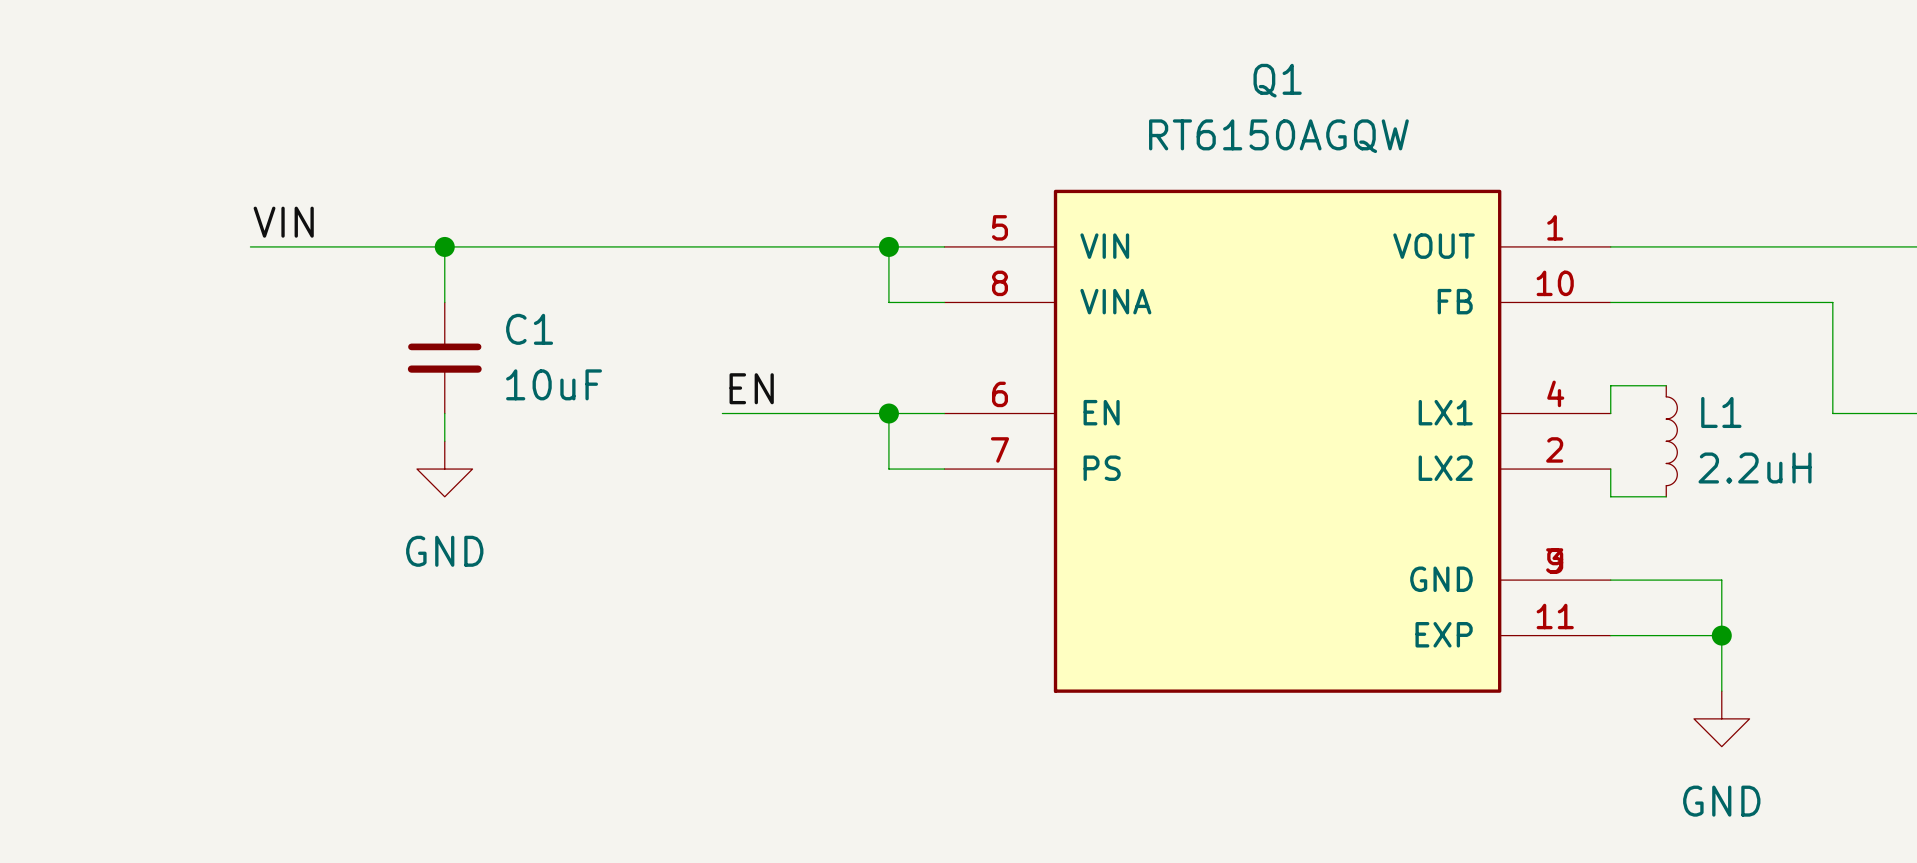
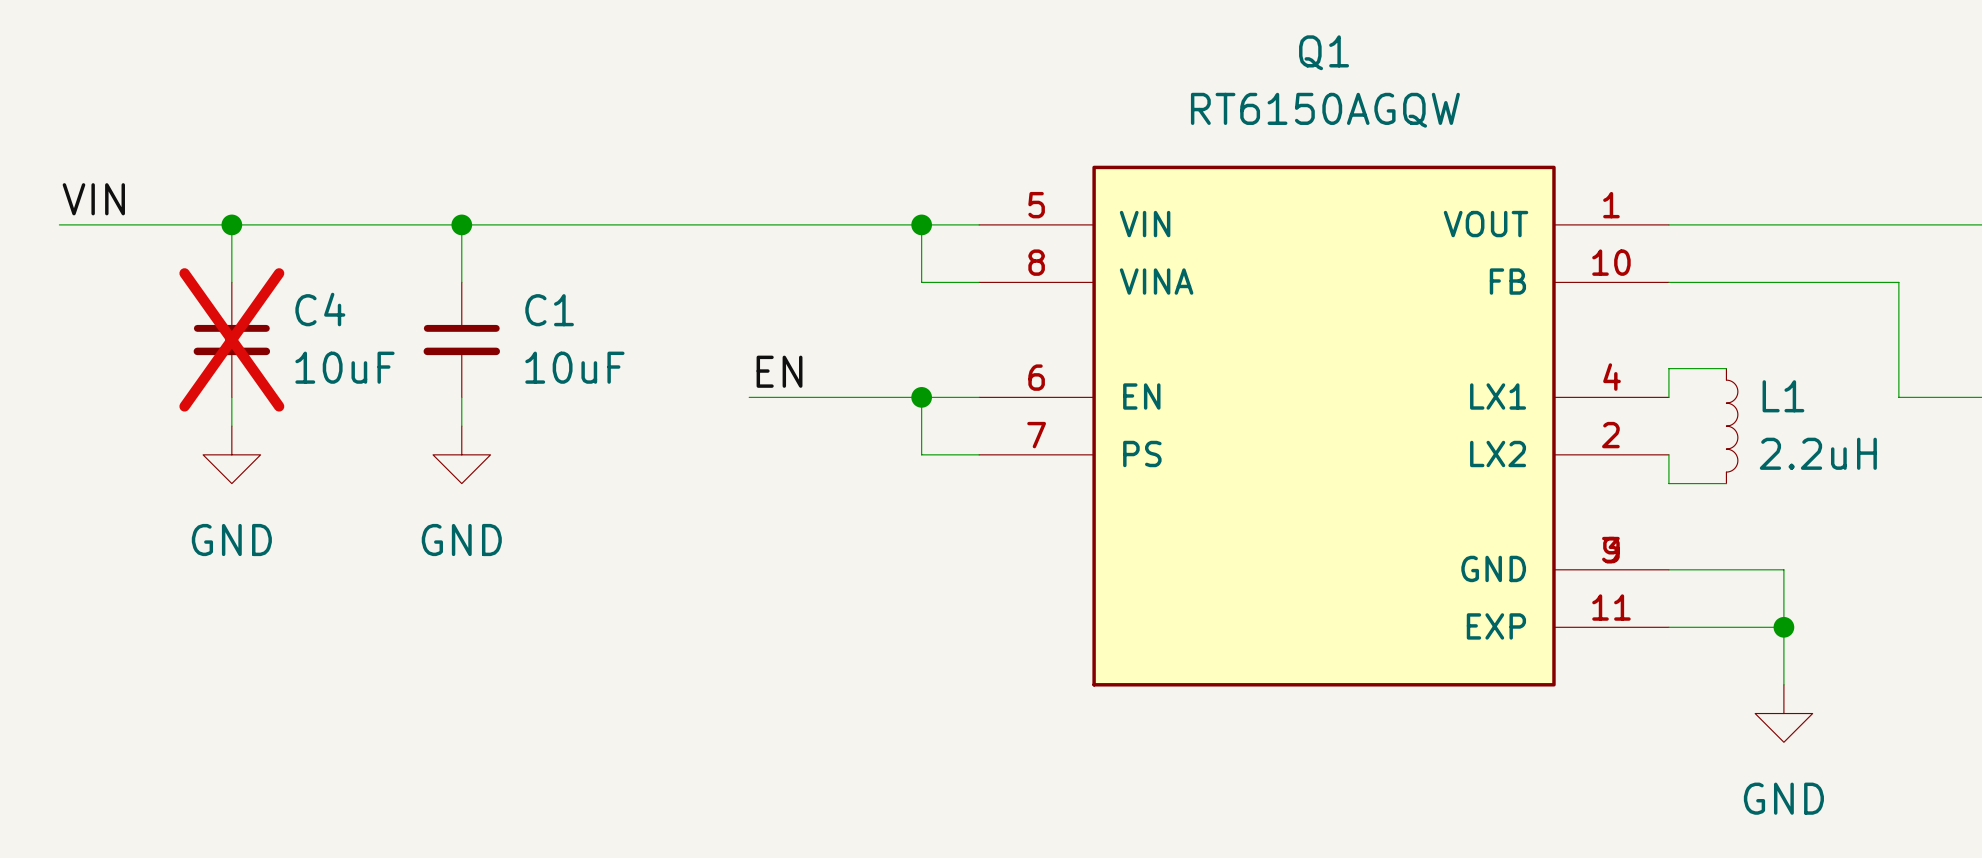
label position: VIN (283, 222) -> VIN (93, 199)
wire: none -> (59, 224) (260, 224)
wire: none -> (231, 224) (231, 282)
junction: none -> (231, 224)
C4: none -> 10uF (231, 339)
wire: none -> (231, 397) (231, 426)
power symbol: none -> GND (231, 454)

